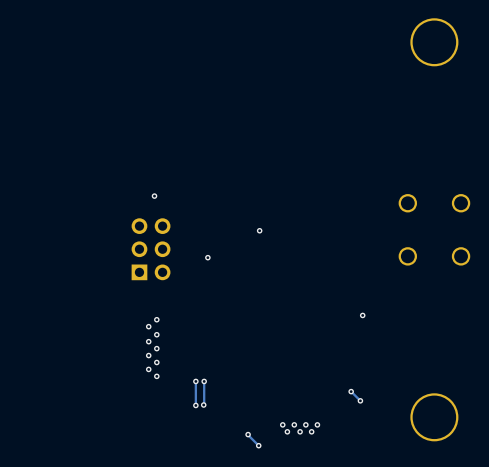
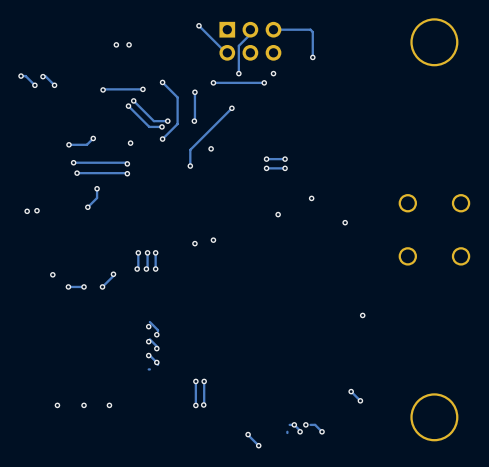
track: none -> (198, 25) (227, 52)
via: none -> (198, 25)
track: none -> (250, 29) (250, 34) (238, 45) (238, 73)
track: none -> (273, 29) (310, 29) (312, 32) (312, 57)
part: none -> (250, 41)
via: none -> (116, 44)
via: none -> (129, 44)
via: none -> (312, 57)
via: none -> (238, 73)
via: none -> (273, 73)
track: none -> (21, 76) (25, 76) (34, 85)
via: none -> (21, 76)
track: none -> (43, 76) (45, 76) (54, 85)
via: none -> (43, 76)
track: none -> (162, 82) (177, 97) (177, 124) (162, 139)
via: none -> (162, 82)
via: none -> (213, 82)
track: none -> (264, 82) (213, 82)
via: none -> (264, 82)
via: none -> (34, 85)
via: none -> (54, 85)
via: none -> (103, 89)
track: none -> (142, 89) (103, 89)
via: none -> (142, 89)
track: none -> (194, 92) (194, 121)
via: none -> (194, 92)
track: none -> (133, 100) (153, 121) (167, 121)
via: none -> (133, 100)
track: none -> (128, 106) (149, 126) (162, 126)
via: none -> (128, 106)
track: none -> (231, 108) (190, 149) (190, 166)
via: none -> (231, 108)
via: none -> (167, 121)
via: none -> (194, 121)
via: none -> (162, 126)
track: none -> (93, 138) (86, 144) (68, 144)
via: none -> (93, 138)
via: none -> (162, 139)
via: none -> (130, 143)
via: none -> (68, 144)
via: none -> (211, 148)
via: none -> (266, 159)
track: none -> (285, 159) (266, 159)
via: none -> (285, 159)
track: none -> (73, 162) (127, 163)
via: none -> (73, 162)
via: none -> (127, 163)
via: none -> (190, 166)
via: none -> (266, 168)
track: none -> (285, 168) (266, 168)
via: none -> (285, 168)
track: none -> (77, 173) (127, 173)
via: none -> (77, 173)
via: none -> (127, 173)
track: none -> (97, 188) (97, 198) (87, 207)
via: none -> (97, 188)
via: (154, 196) -> none
via: none -> (311, 198)
via: none -> (87, 207)
via: none -> (36, 210)
via: none -> (27, 211)
via: none -> (278, 214)
via: none -> (345, 222)
via: (259, 230) -> none
via: none -> (213, 240)
via: none -> (194, 243)
part: (151, 249) -> none
track: none -> (138, 252) (137, 269)
via: none -> (138, 252)
track: none -> (147, 252) (146, 269)
via: none -> (147, 252)
track: none -> (155, 252) (155, 269)
via: none -> (155, 252)
via: (207, 257) -> none
via: none -> (137, 269)
via: none -> (146, 269)
via: none -> (155, 269)
via: none -> (52, 274)
track: none -> (113, 274) (102, 286)
via: none -> (113, 274)
via: none -> (68, 286)
track: none -> (84, 286) (68, 286)
via: none -> (84, 286)
via: none -> (102, 286)
via: (156, 319) -> none
track: none -> (149, 322) (157, 331)
track: none -> (149, 339) (157, 347)
track: none -> (149, 355) (157, 364)
via: (148, 369) -> none
via: (156, 376) -> none
via: none -> (57, 405)
via: none -> (84, 405)
via: none -> (109, 405)
via: (282, 424) -> none
track: none -> (289, 424) (294, 424) (301, 431)
track: none -> (310, 424) (315, 424) (322, 431)
via: (317, 424) -> none
via: (287, 431) -> none
via: (311, 431) -> none
via: none -> (322, 431)

